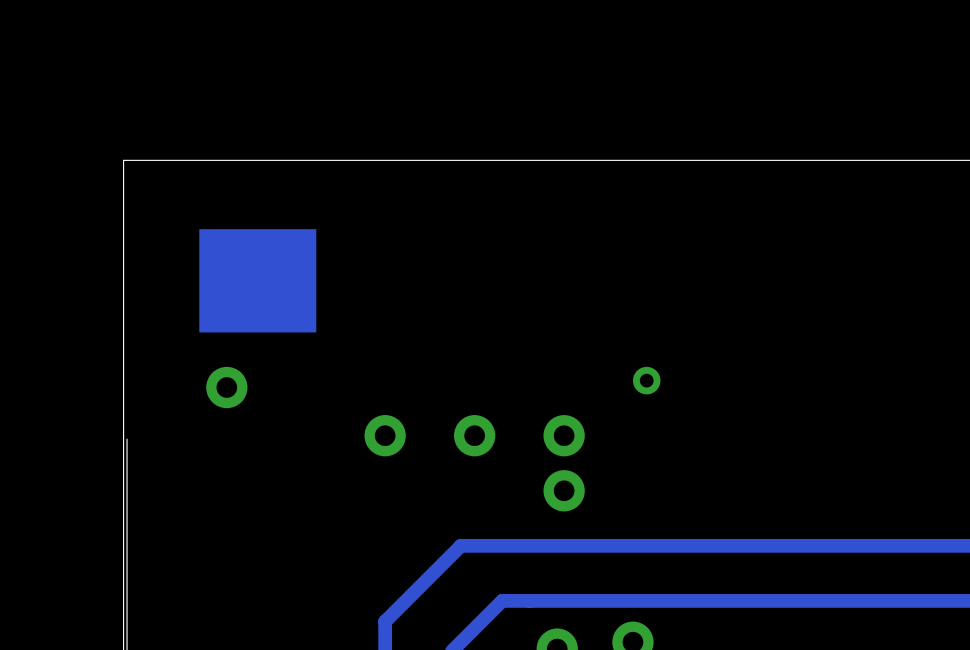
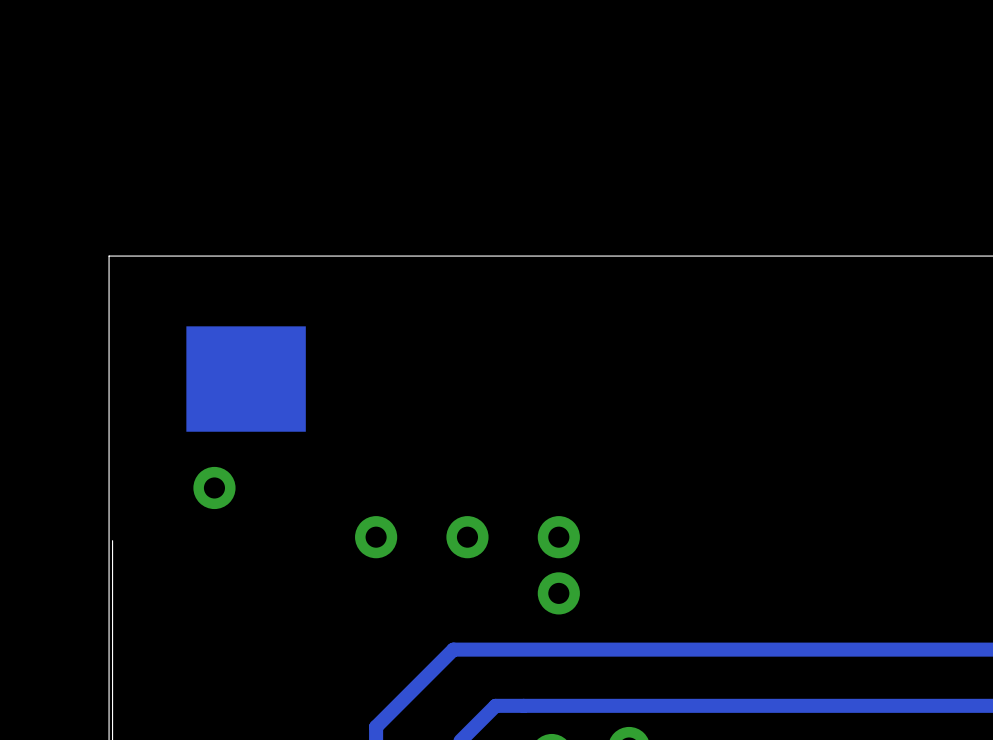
via: (646, 380) -> none

